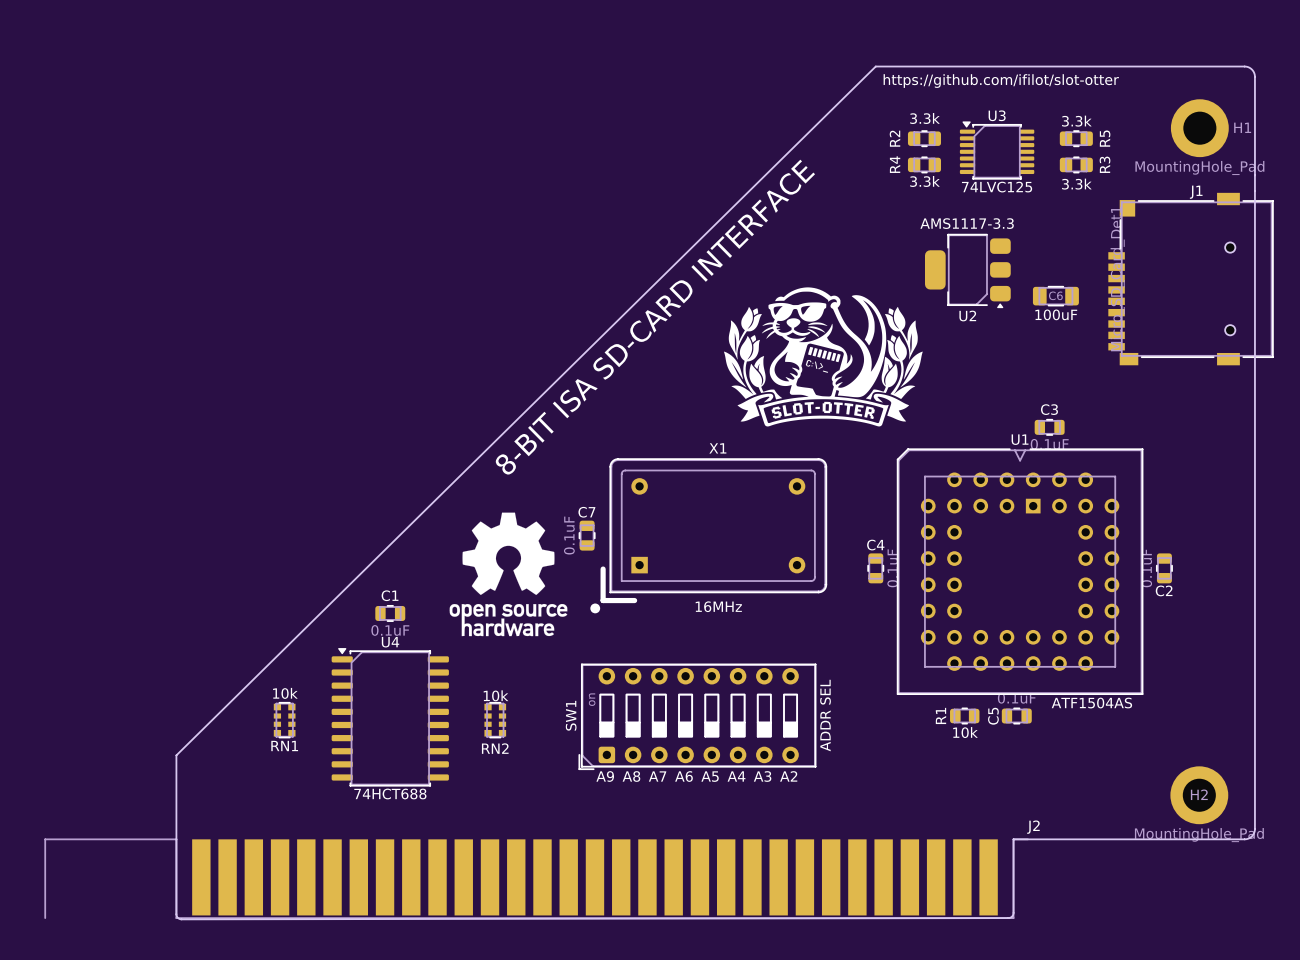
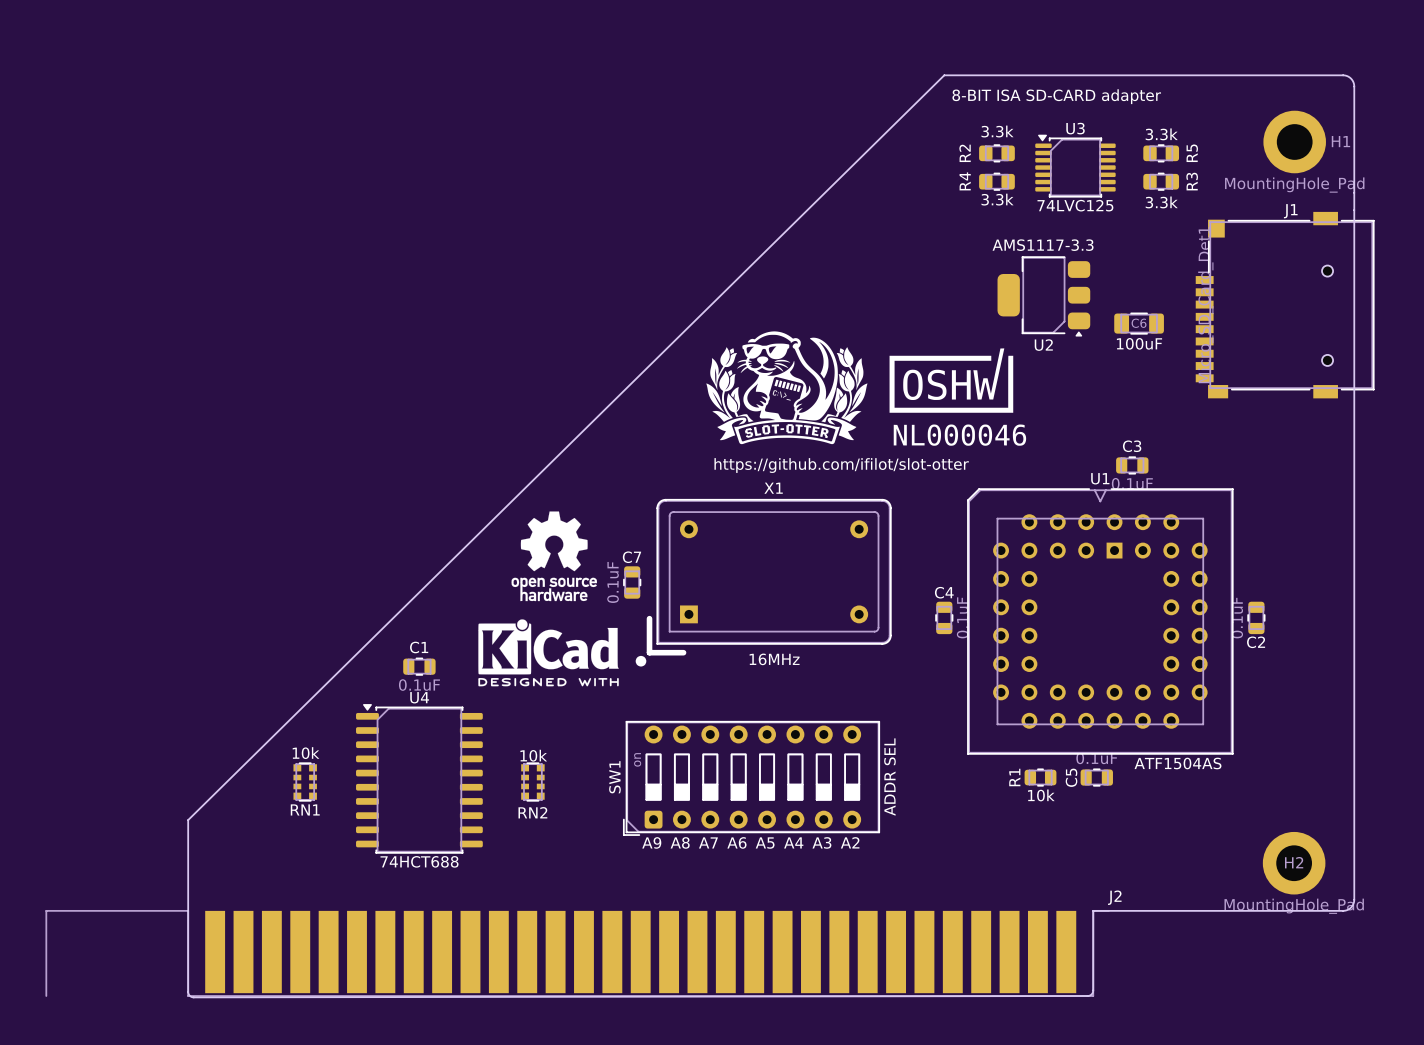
text: https://github.com/ifilot/slot-otter (1001, 81) -> 8-BIT ISA SD-CARD adapter (1056, 96)
drawing: [723, 287, 923, 427] -> none
drawing: none -> [706, 331, 868, 445]
text: 8-BIT ISA SD-CARD INTERFACE (655, 317) -> none
drawing: none -> [889, 348, 1027, 446]
text: none -> https://github.com/ifilot/slot-otter (841, 465)
drawing: none -> [511, 511, 597, 602]
drawing: [449, 512, 568, 637] -> none
drawing: none -> [478, 619, 619, 687]

